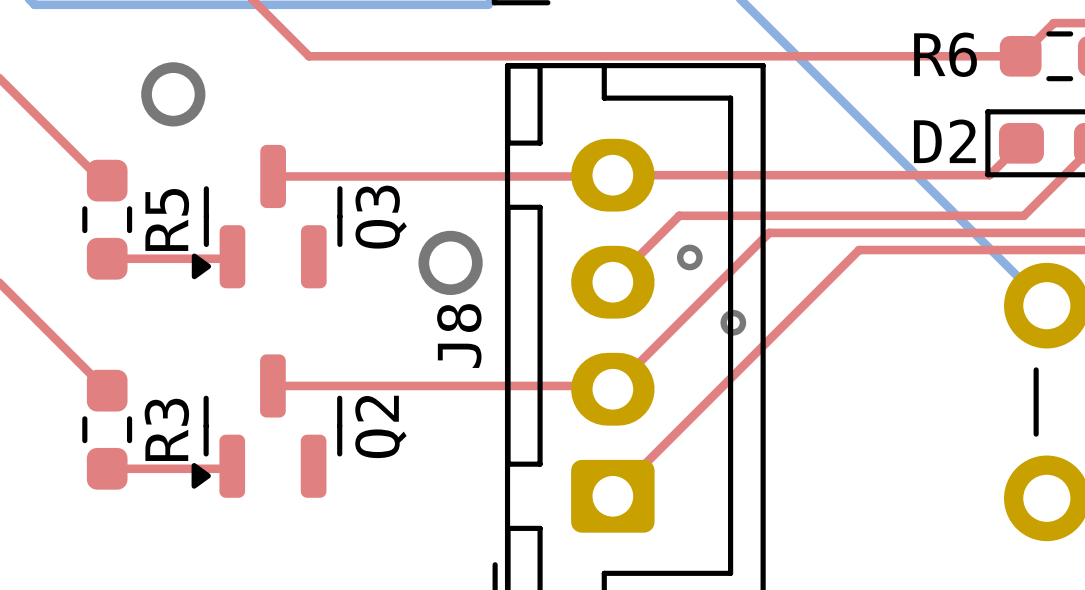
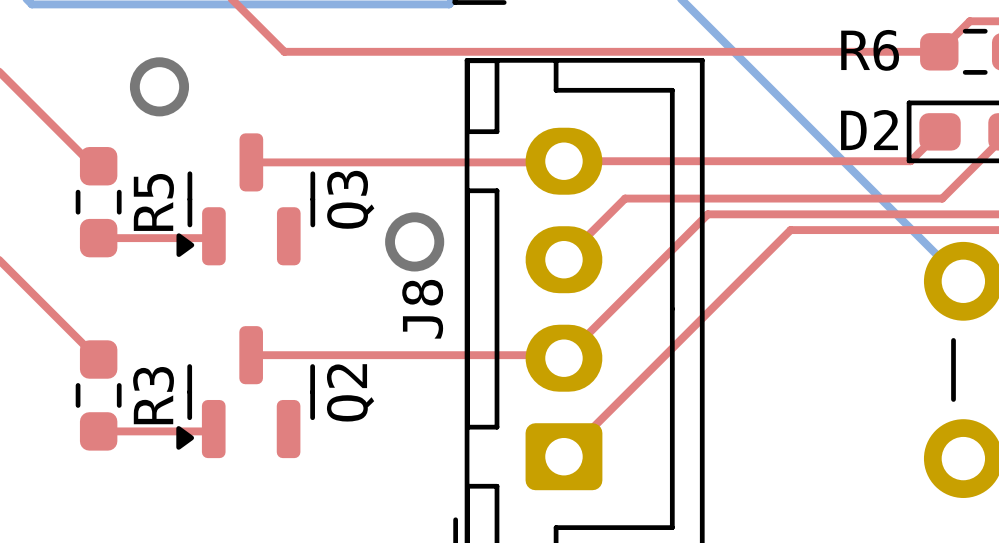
via: (689, 257) -> none
via: (733, 322) -> none

